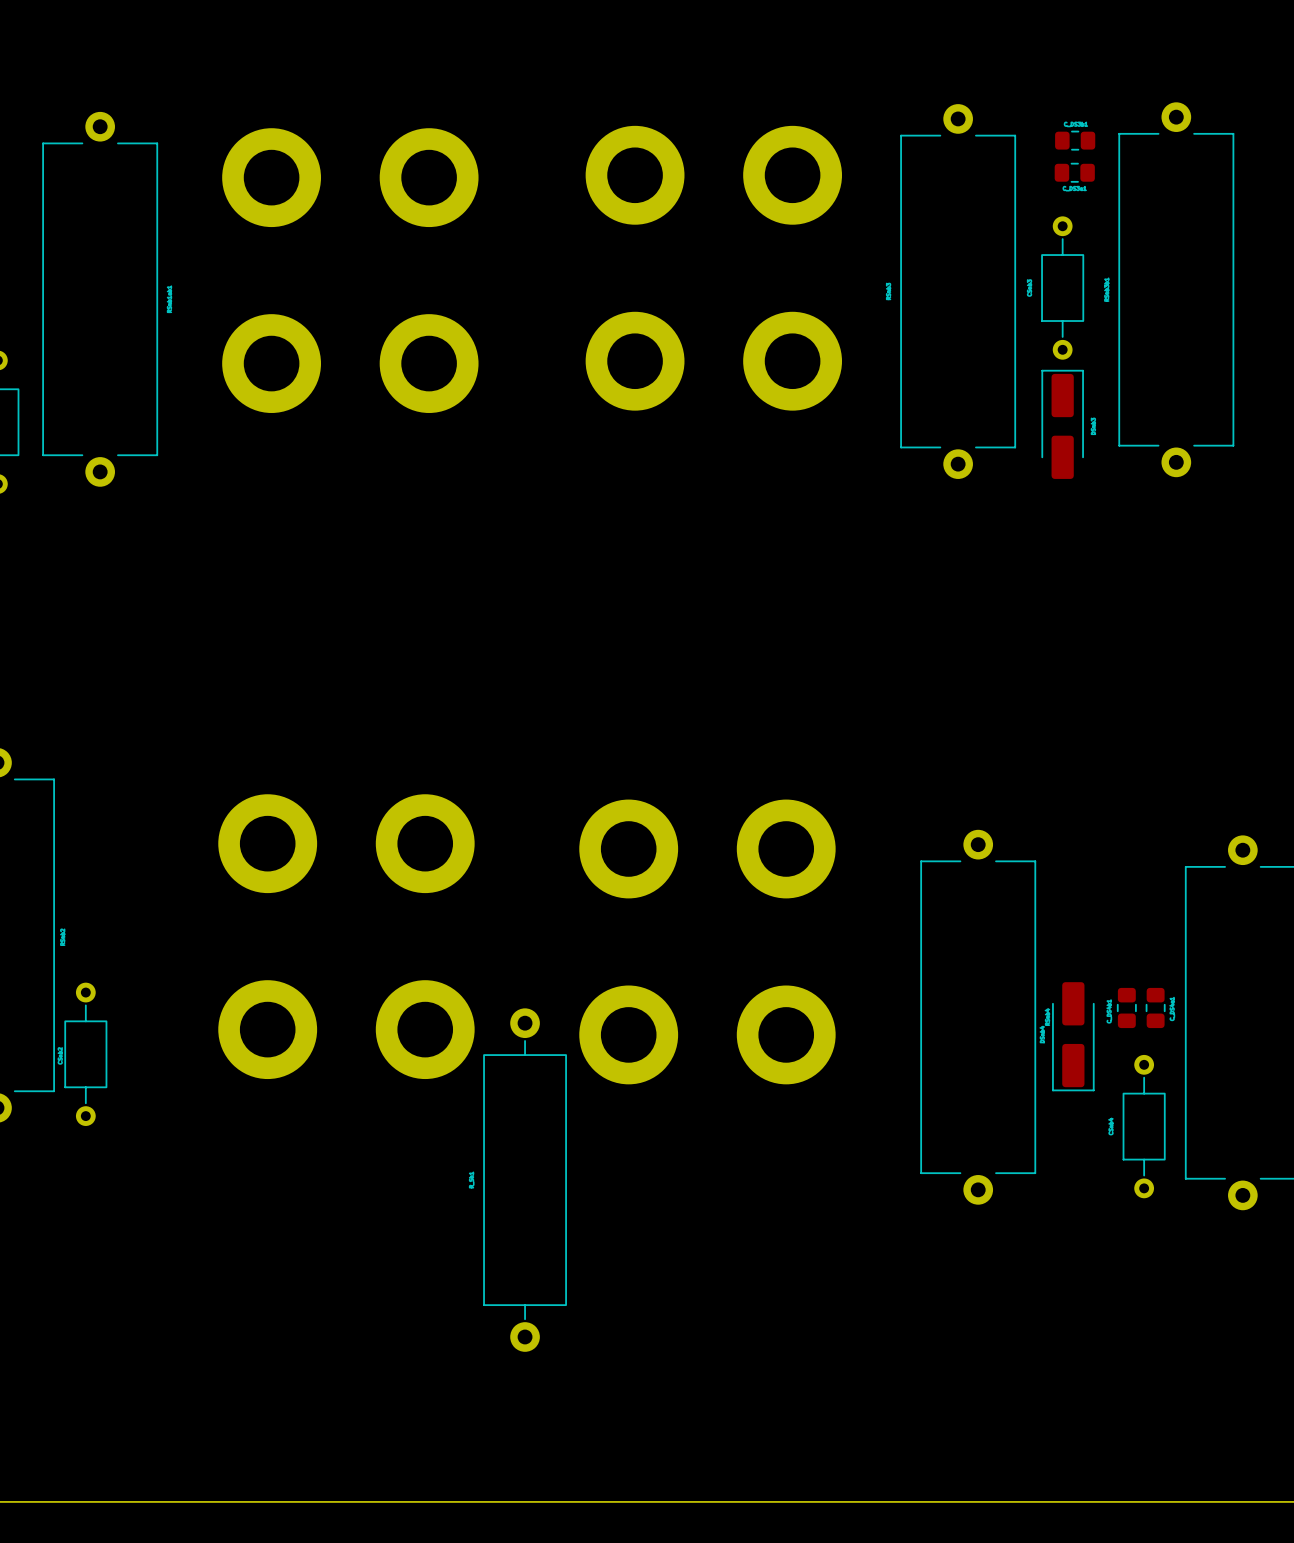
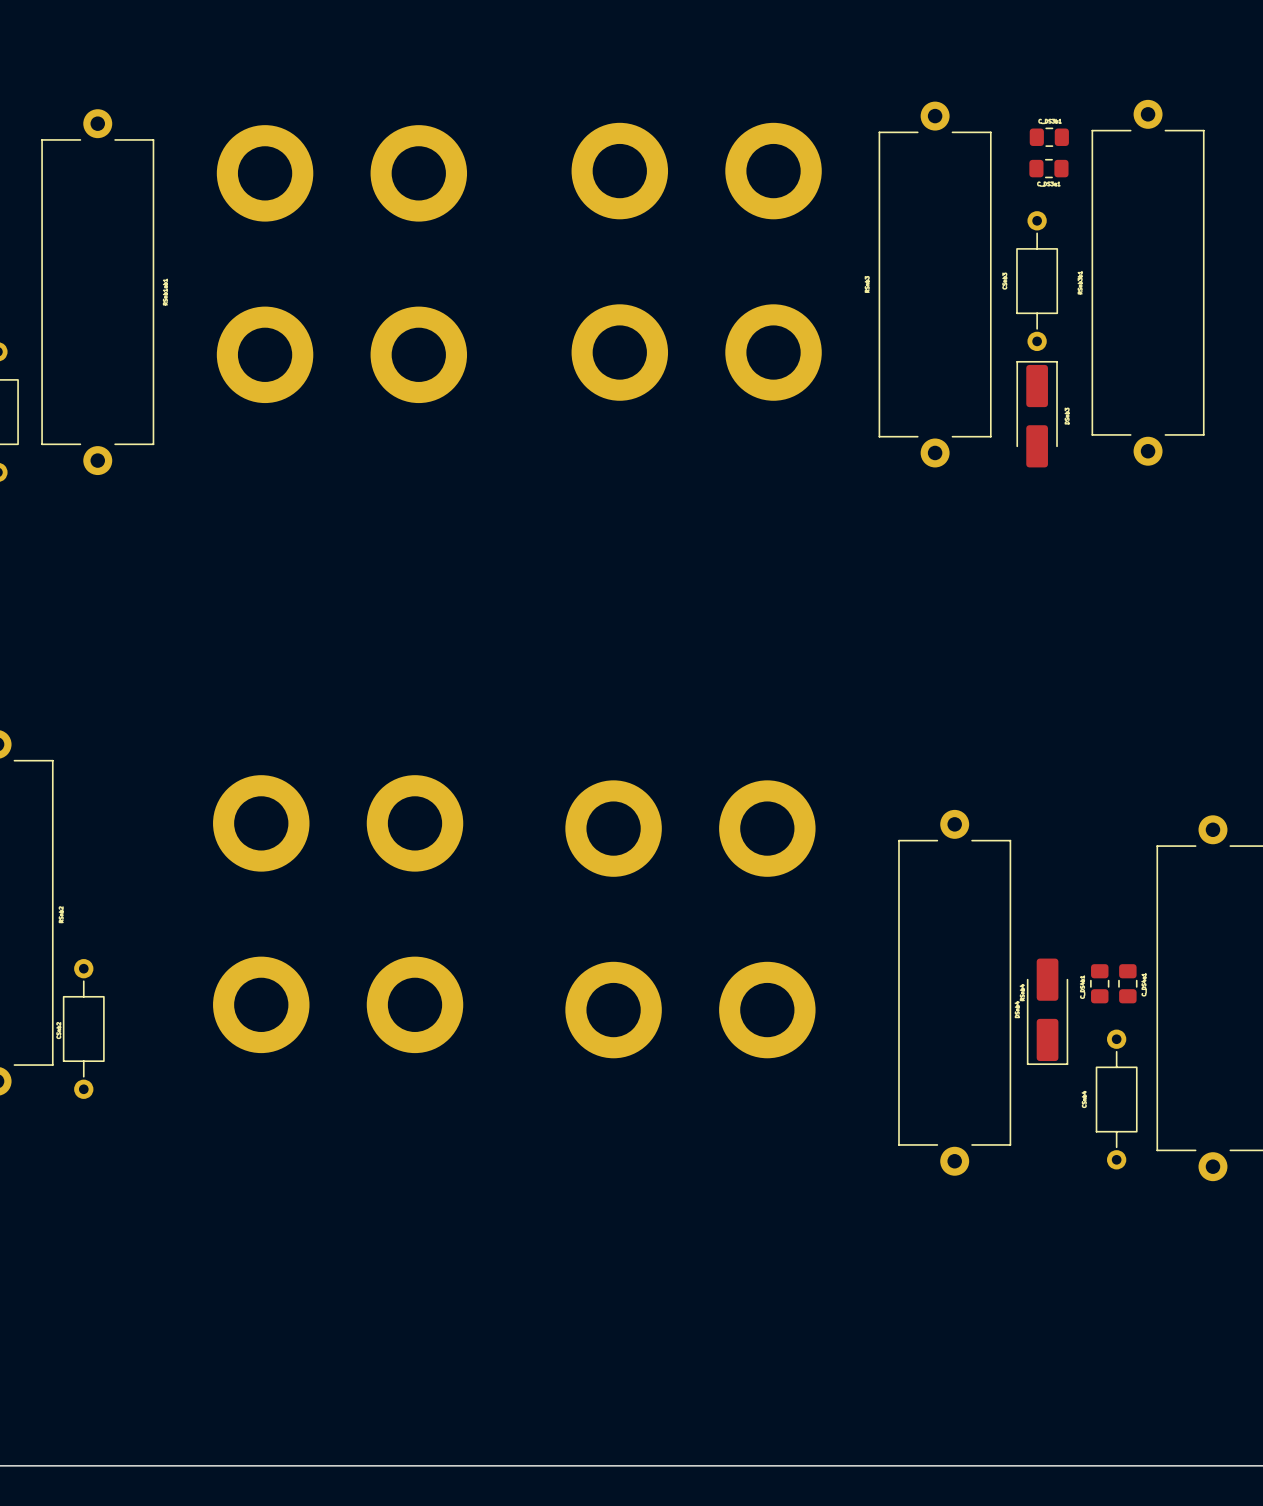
part: (525, 1180) -> none

